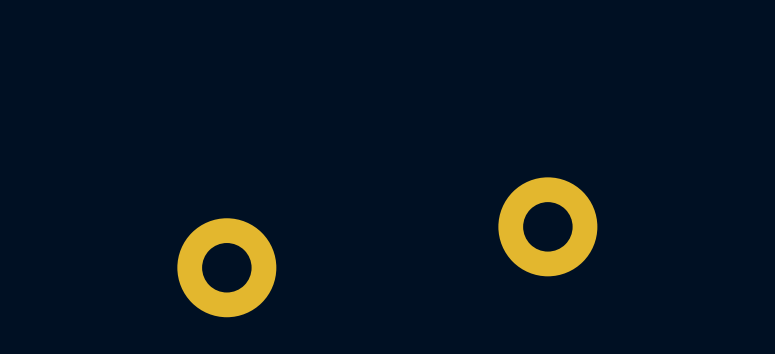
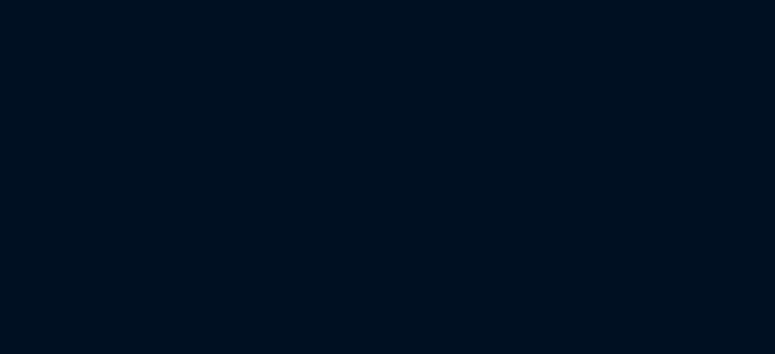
part: (547, 226) -> none
part: (226, 267) -> none

